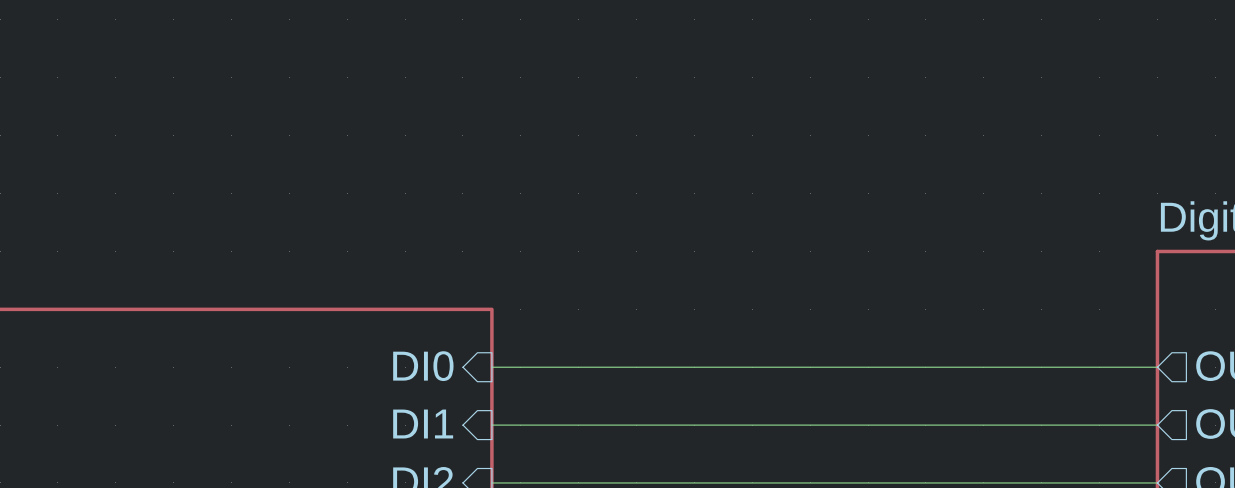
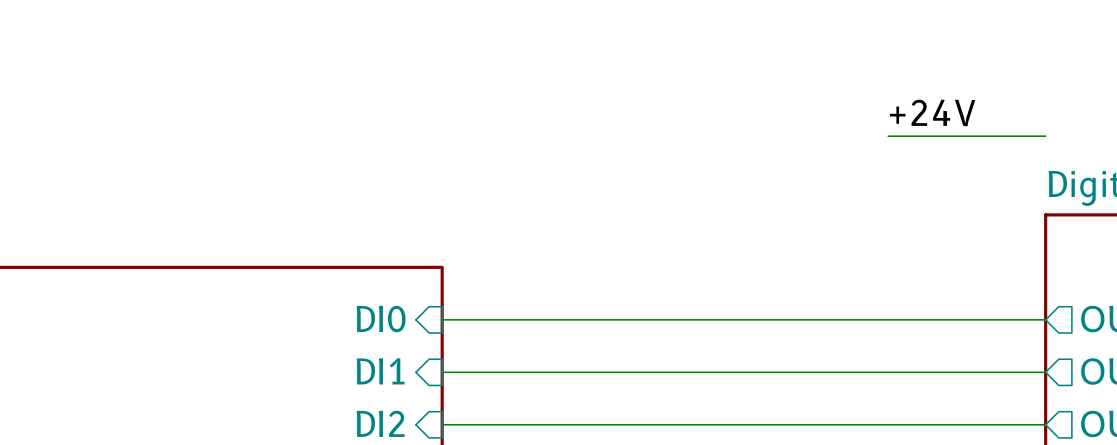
label: none -> +24V (932, 112)
wire: none -> (888, 136) (1045, 136)

